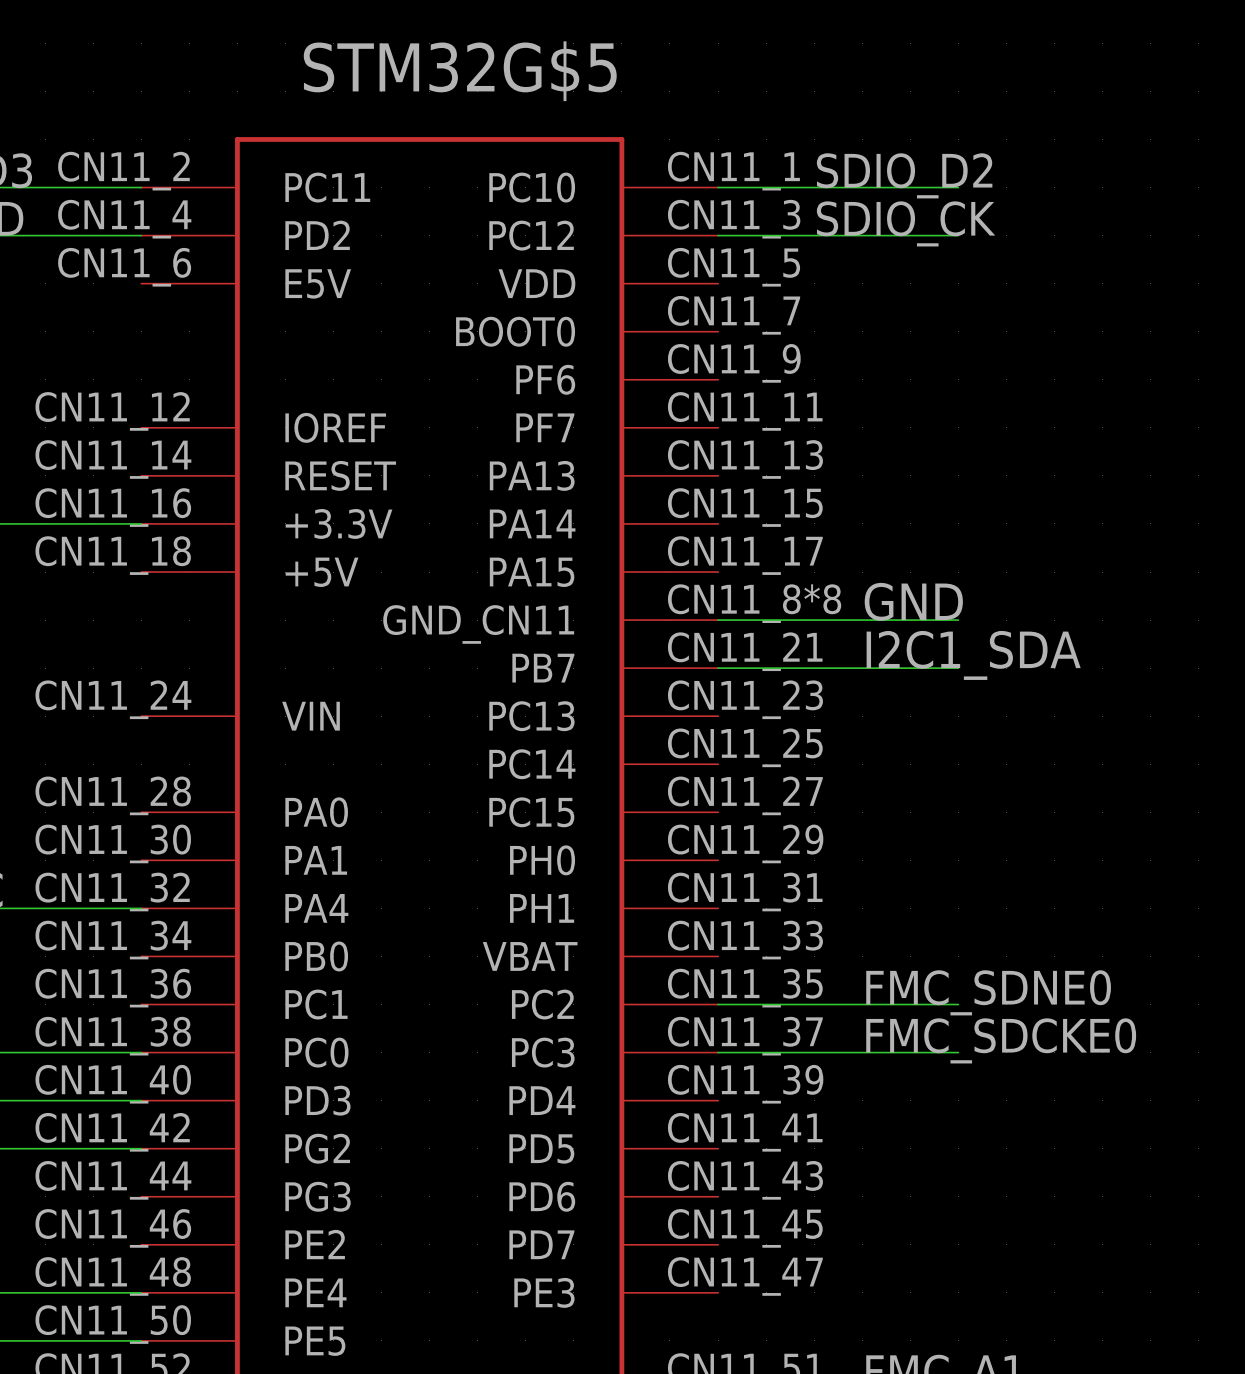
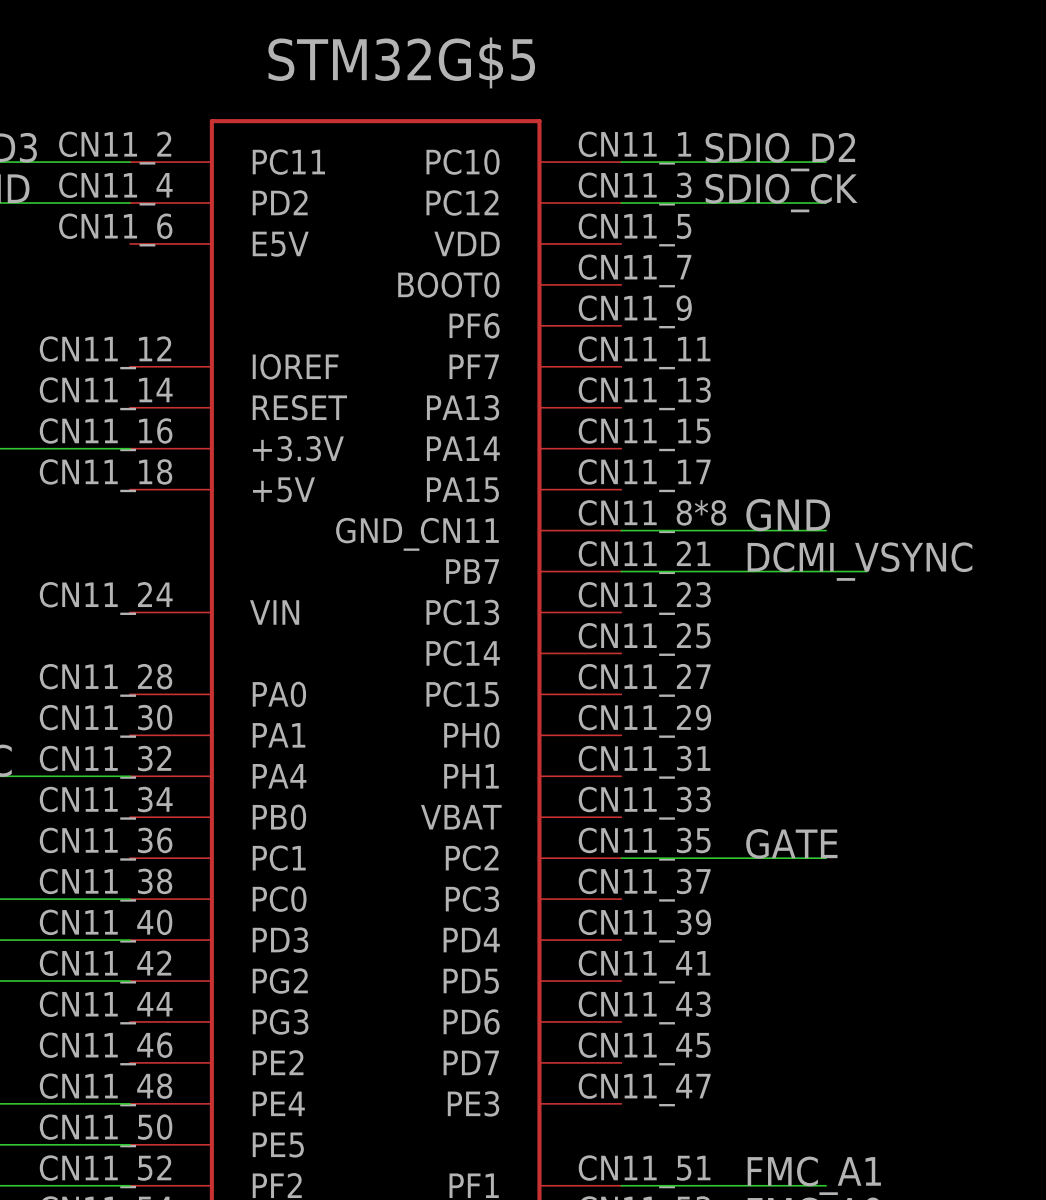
label: I2C1_SDA (973, 655) -> DCMI_VSYNC (860, 561)
wire: none -> (826, 571) (867, 571)
label: FMC_SDNE0 (988, 992) -> GATE (791, 843)
label: FMC_SDCKE0 (1001, 1040) -> none
wire: (718, 1052) (958, 1052) -> none

